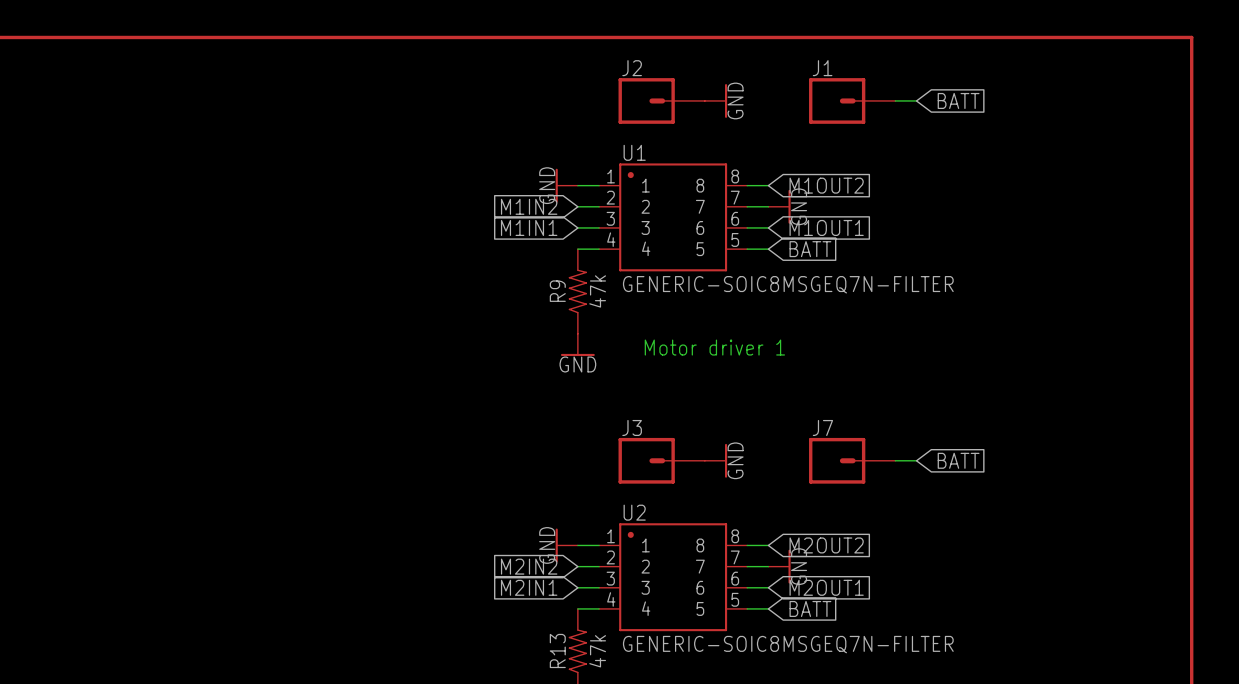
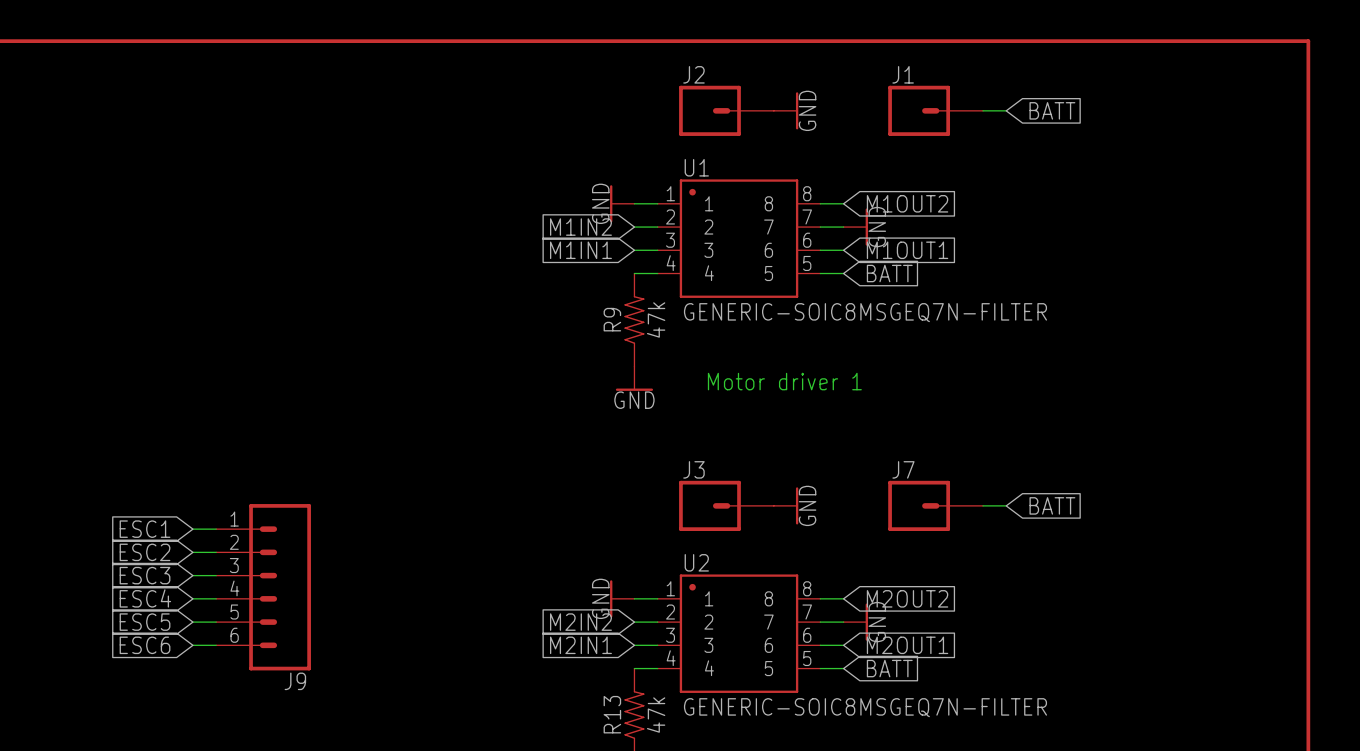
global label: none -> ESC1 (145, 529)
wire: none -> (192, 529) (216, 529)
global label: none -> ESC2 (145, 552)
wire: none -> (192, 552) (216, 552)
global label: none -> ESC3 (145, 575)
wire: none -> (192, 575) (216, 575)
J9: none -> (263, 587)
global label: none -> ESC4 (145, 598)
wire: none -> (192, 598) (216, 598)
global label: none -> ESC5 (145, 622)
wire: none -> (192, 622) (216, 622)
global label: none -> ESC6 (145, 645)
wire: none -> (192, 645) (216, 645)

